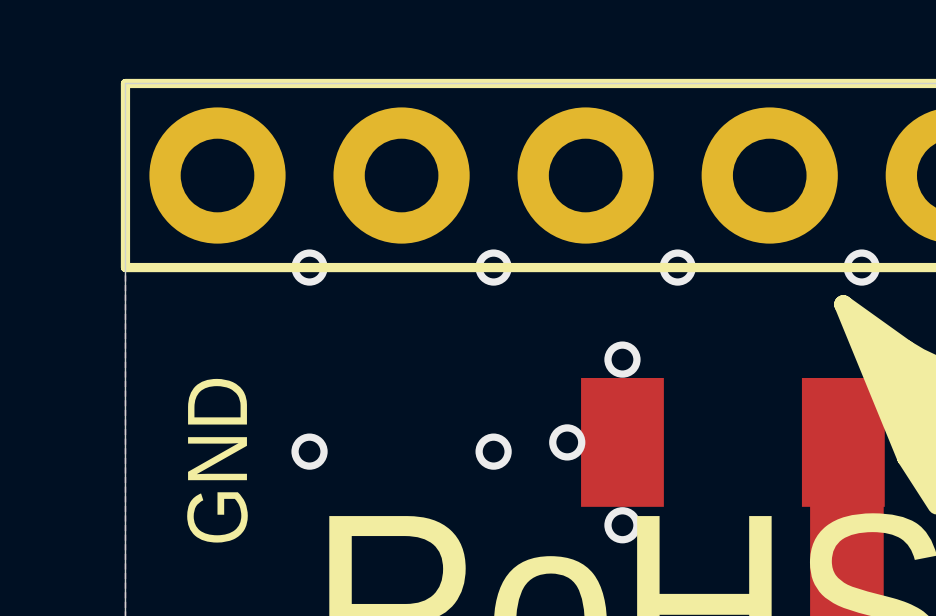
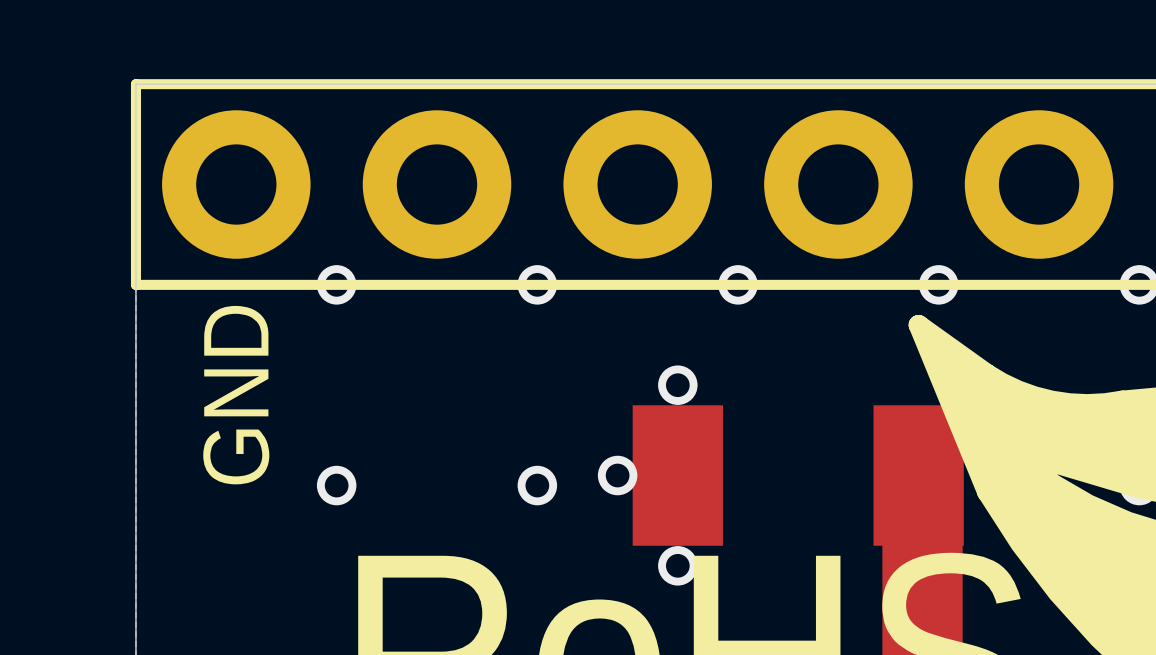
text position: GND (217, 460) -> GND (236, 395)

